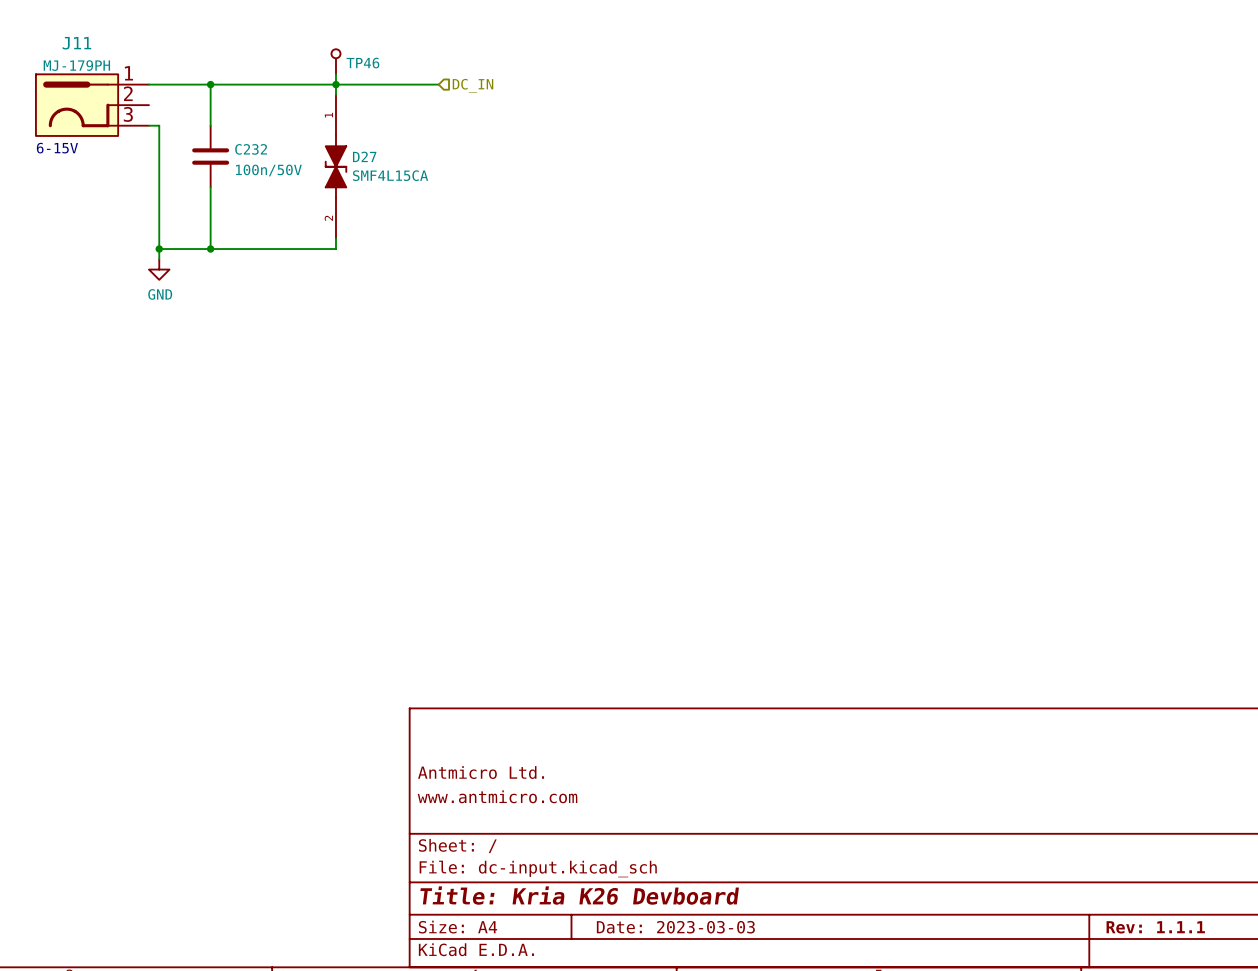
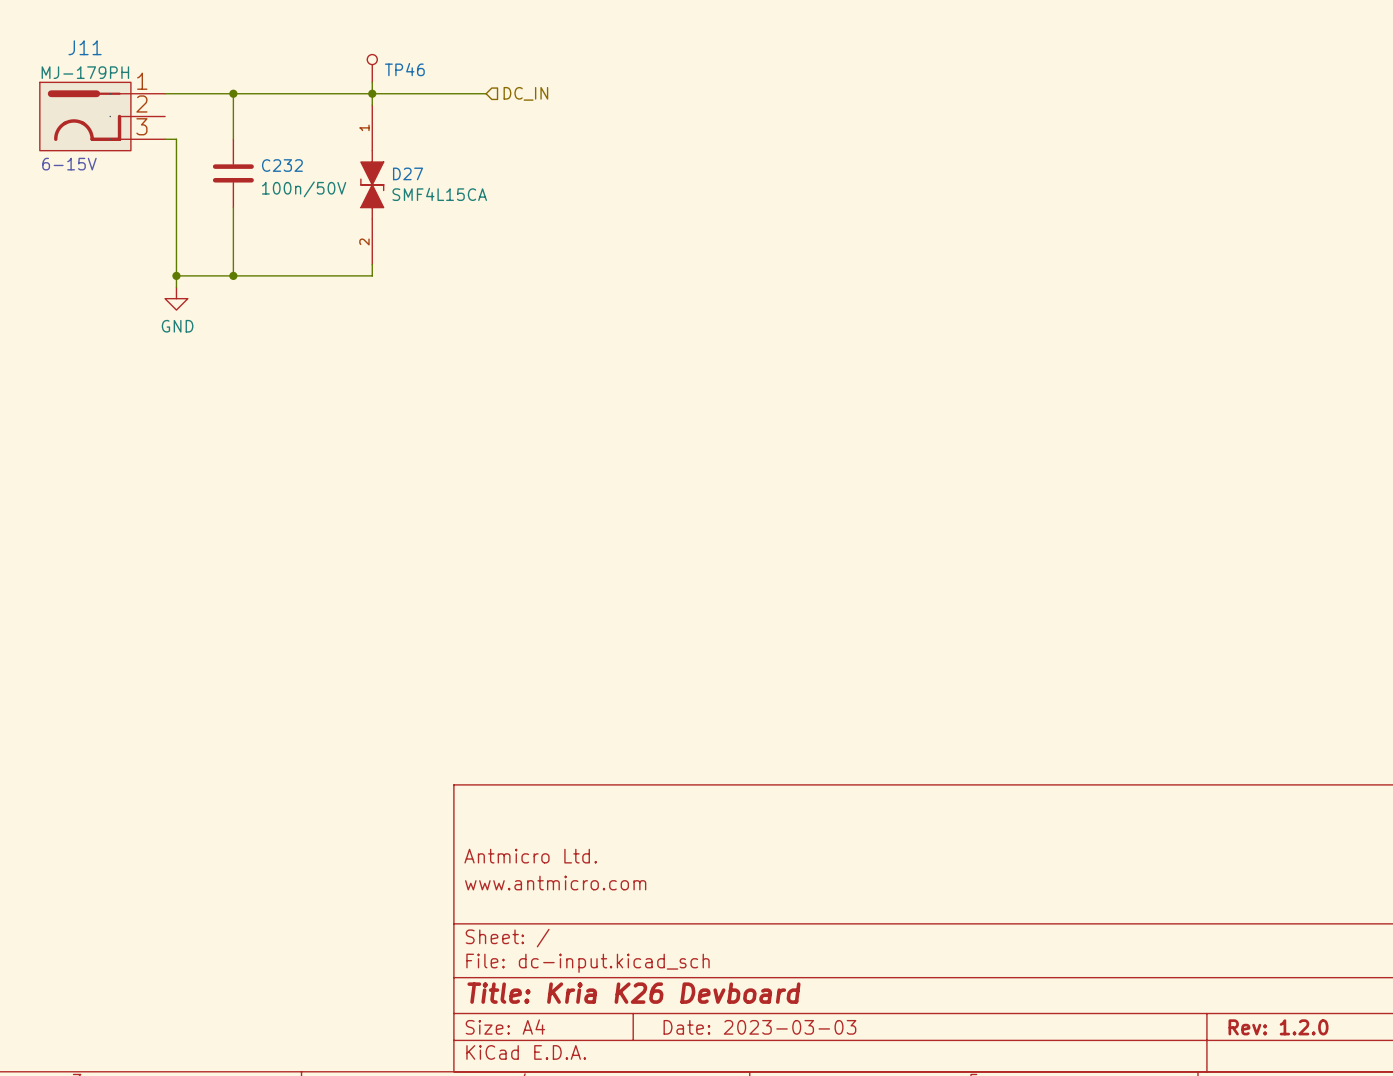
title block: Rev: 1.1.1 (1155, 927) -> Rev: 1.2.0 (1278, 1027)

